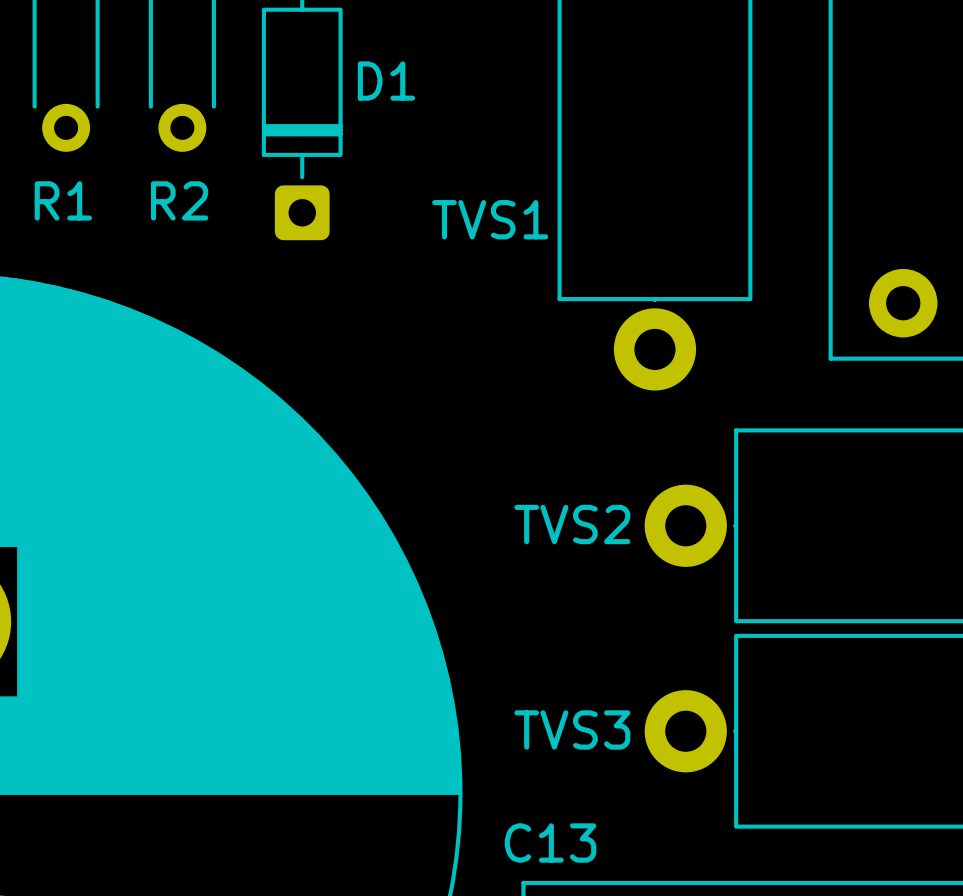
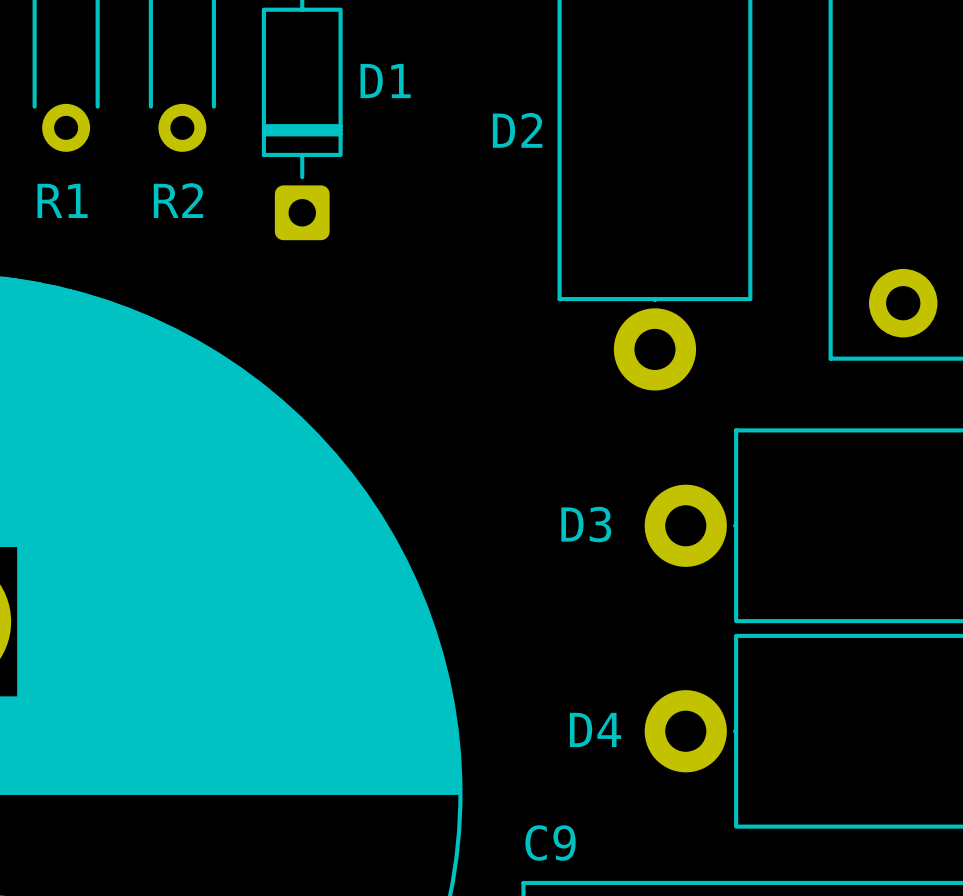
TVS1 name: TVS1 (490, 219) -> D2 (517, 130)
TVS2 name: TVS2 (572, 524) -> D3 (586, 524)
TVS3 name: TVS3 (572, 729) -> D4 (595, 729)
C13 name: C13 (550, 842) -> C9 (550, 843)

